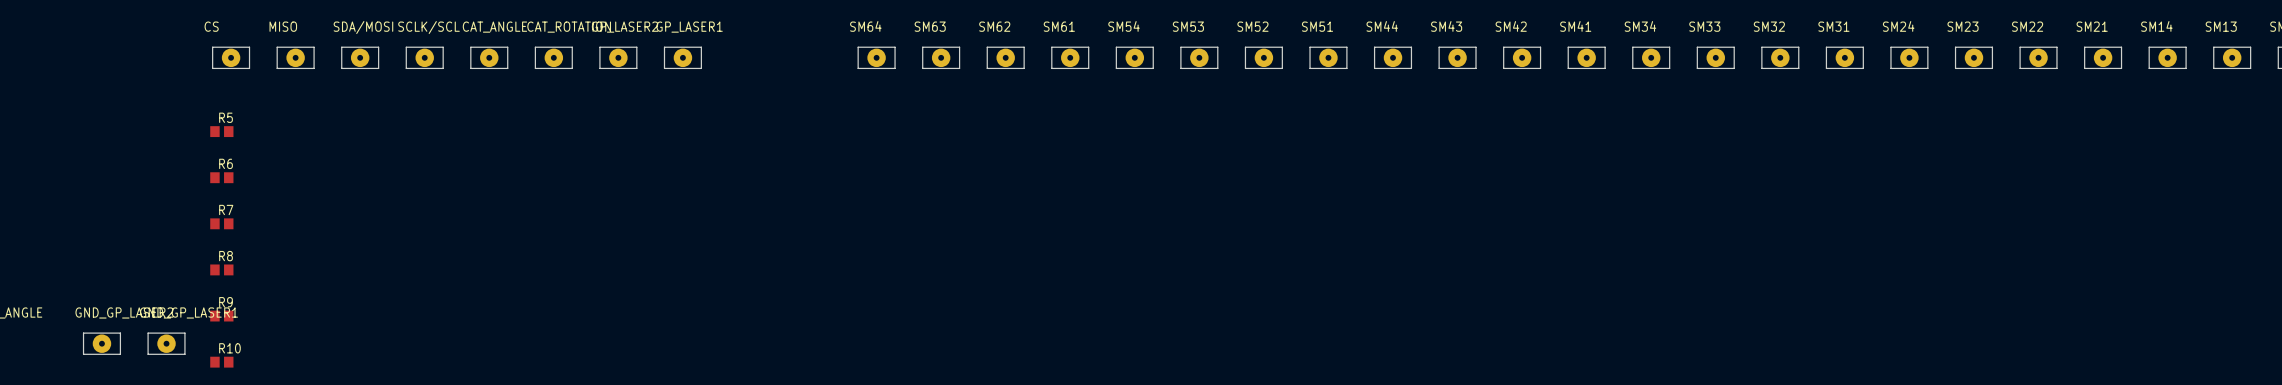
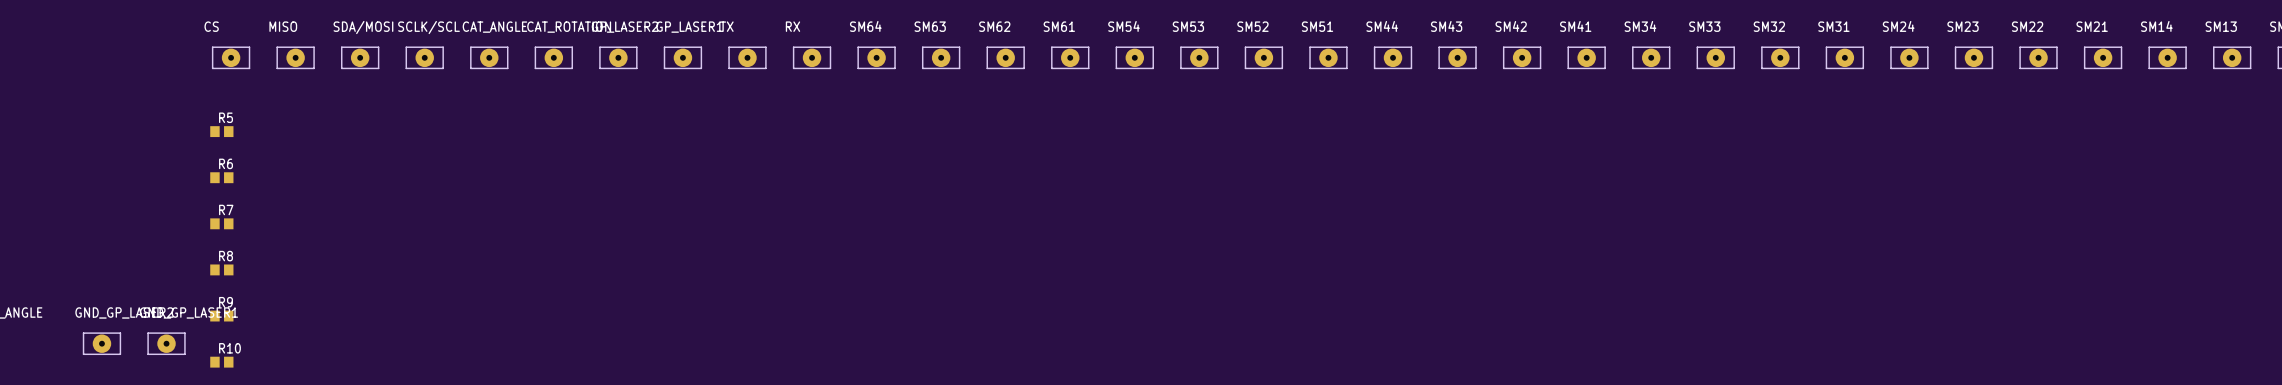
TX: none -> (747, 57)
RX: none -> (812, 57)

